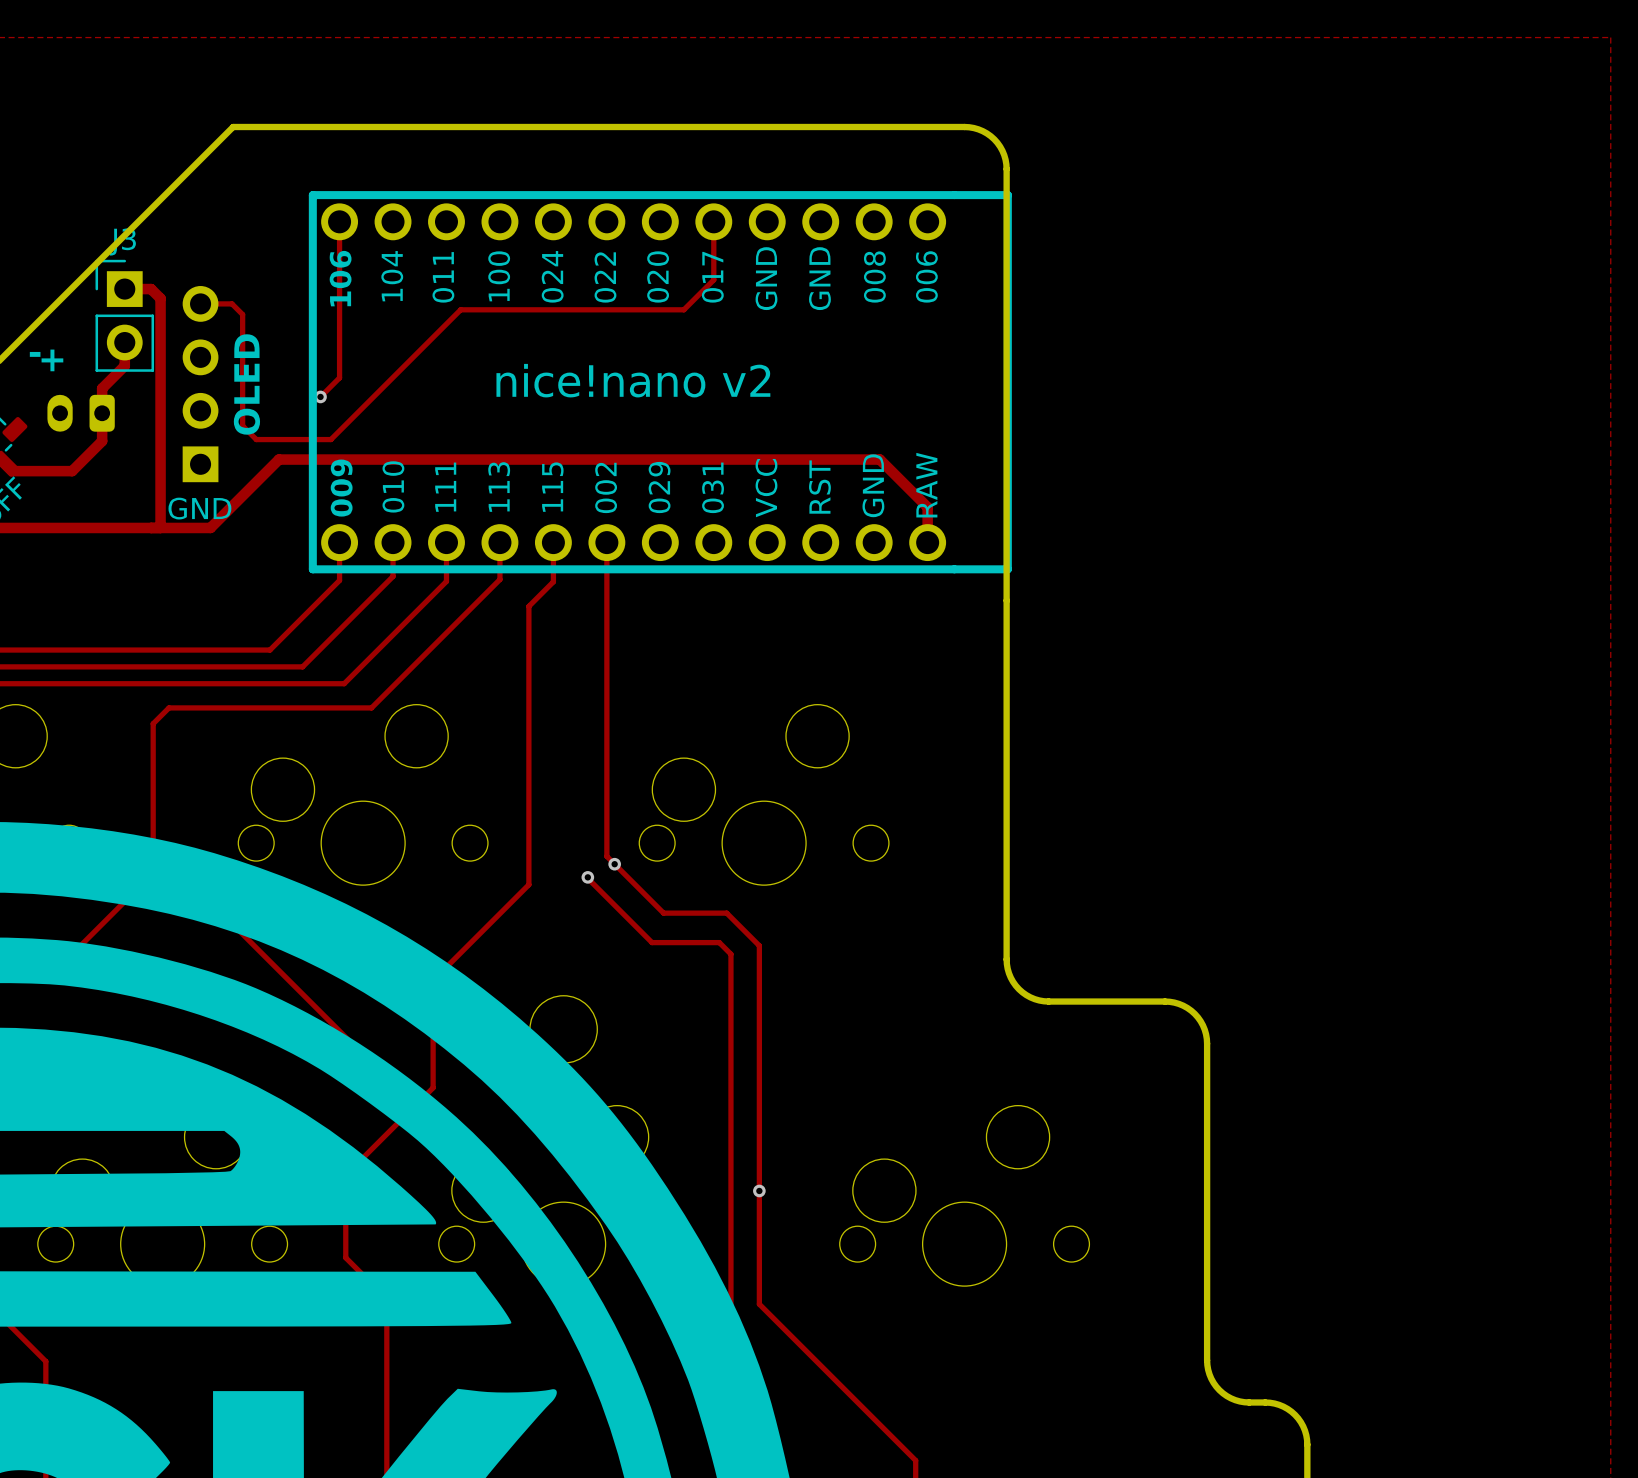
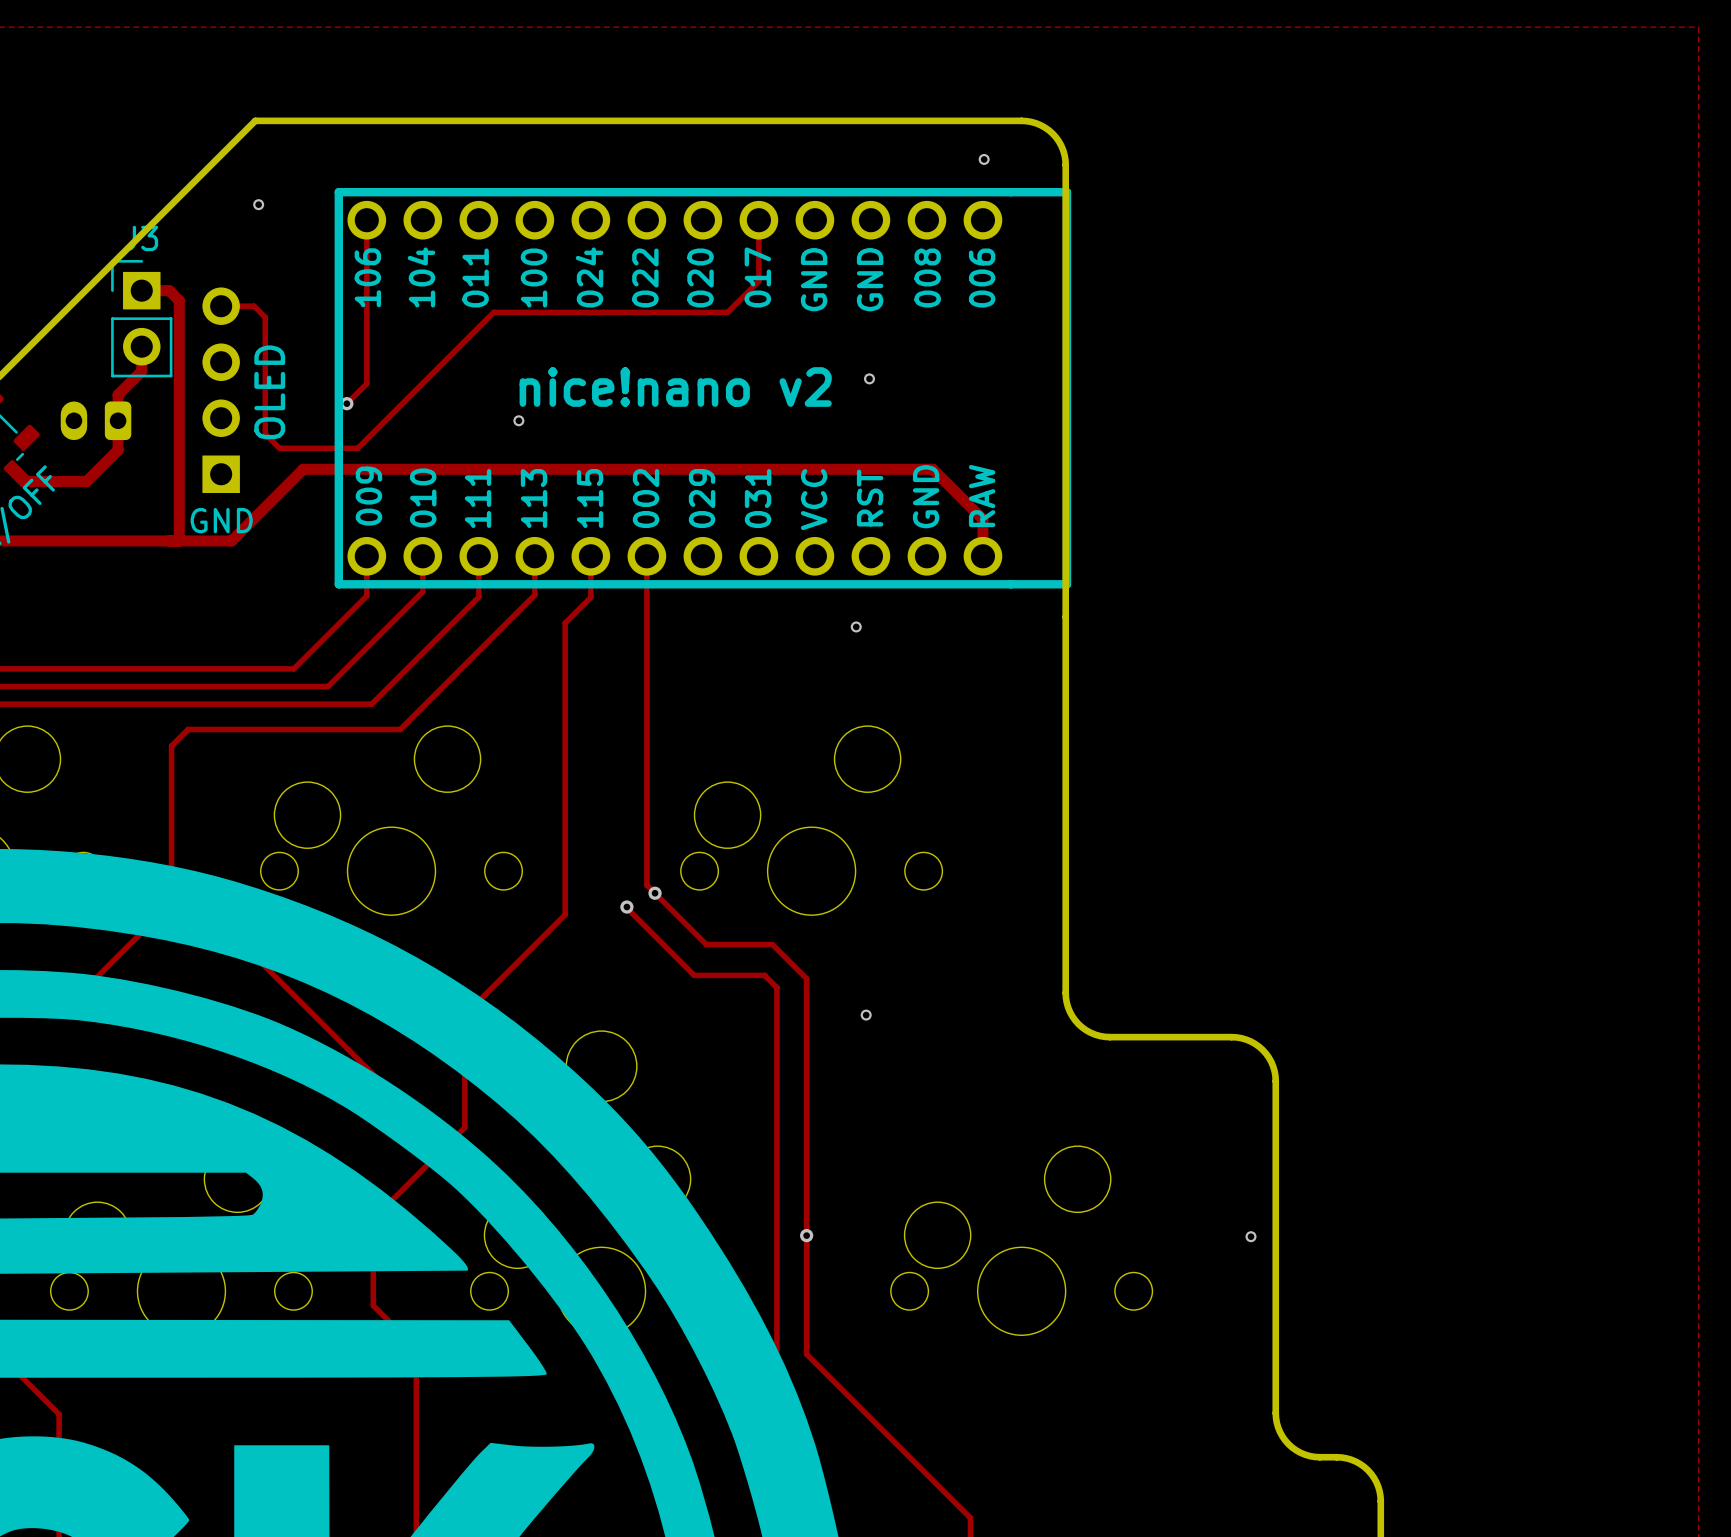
via: none -> (984, 159)
via: none -> (258, 204)
text: - (35, 354) -> none
text: + (52, 360) -> none
via: none -> (869, 378)
via: none -> (518, 420)
via: none -> (856, 626)
via: none -> (866, 1015)
via: none -> (1251, 1236)

